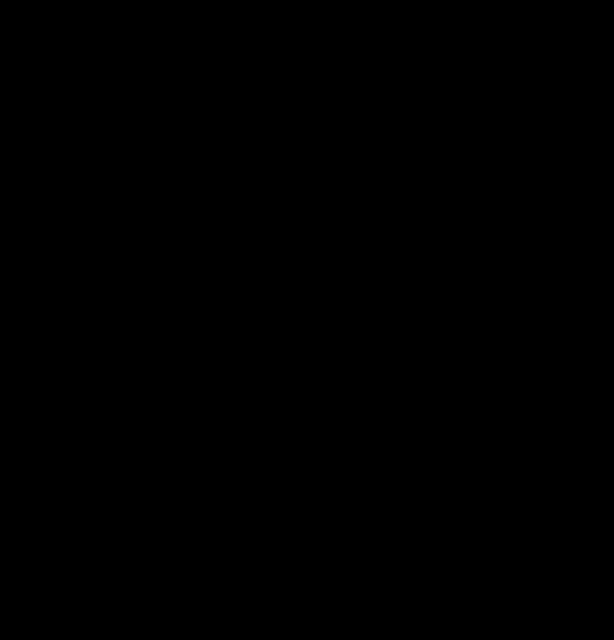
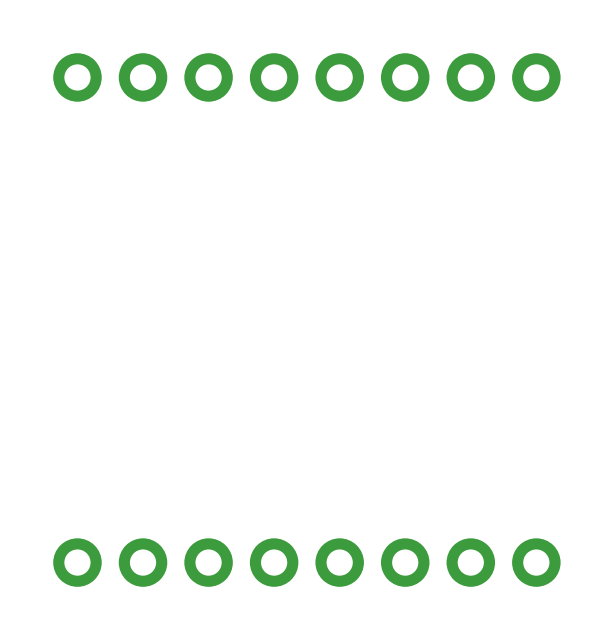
part: none -> (306, 77)
part: none -> (306, 562)

